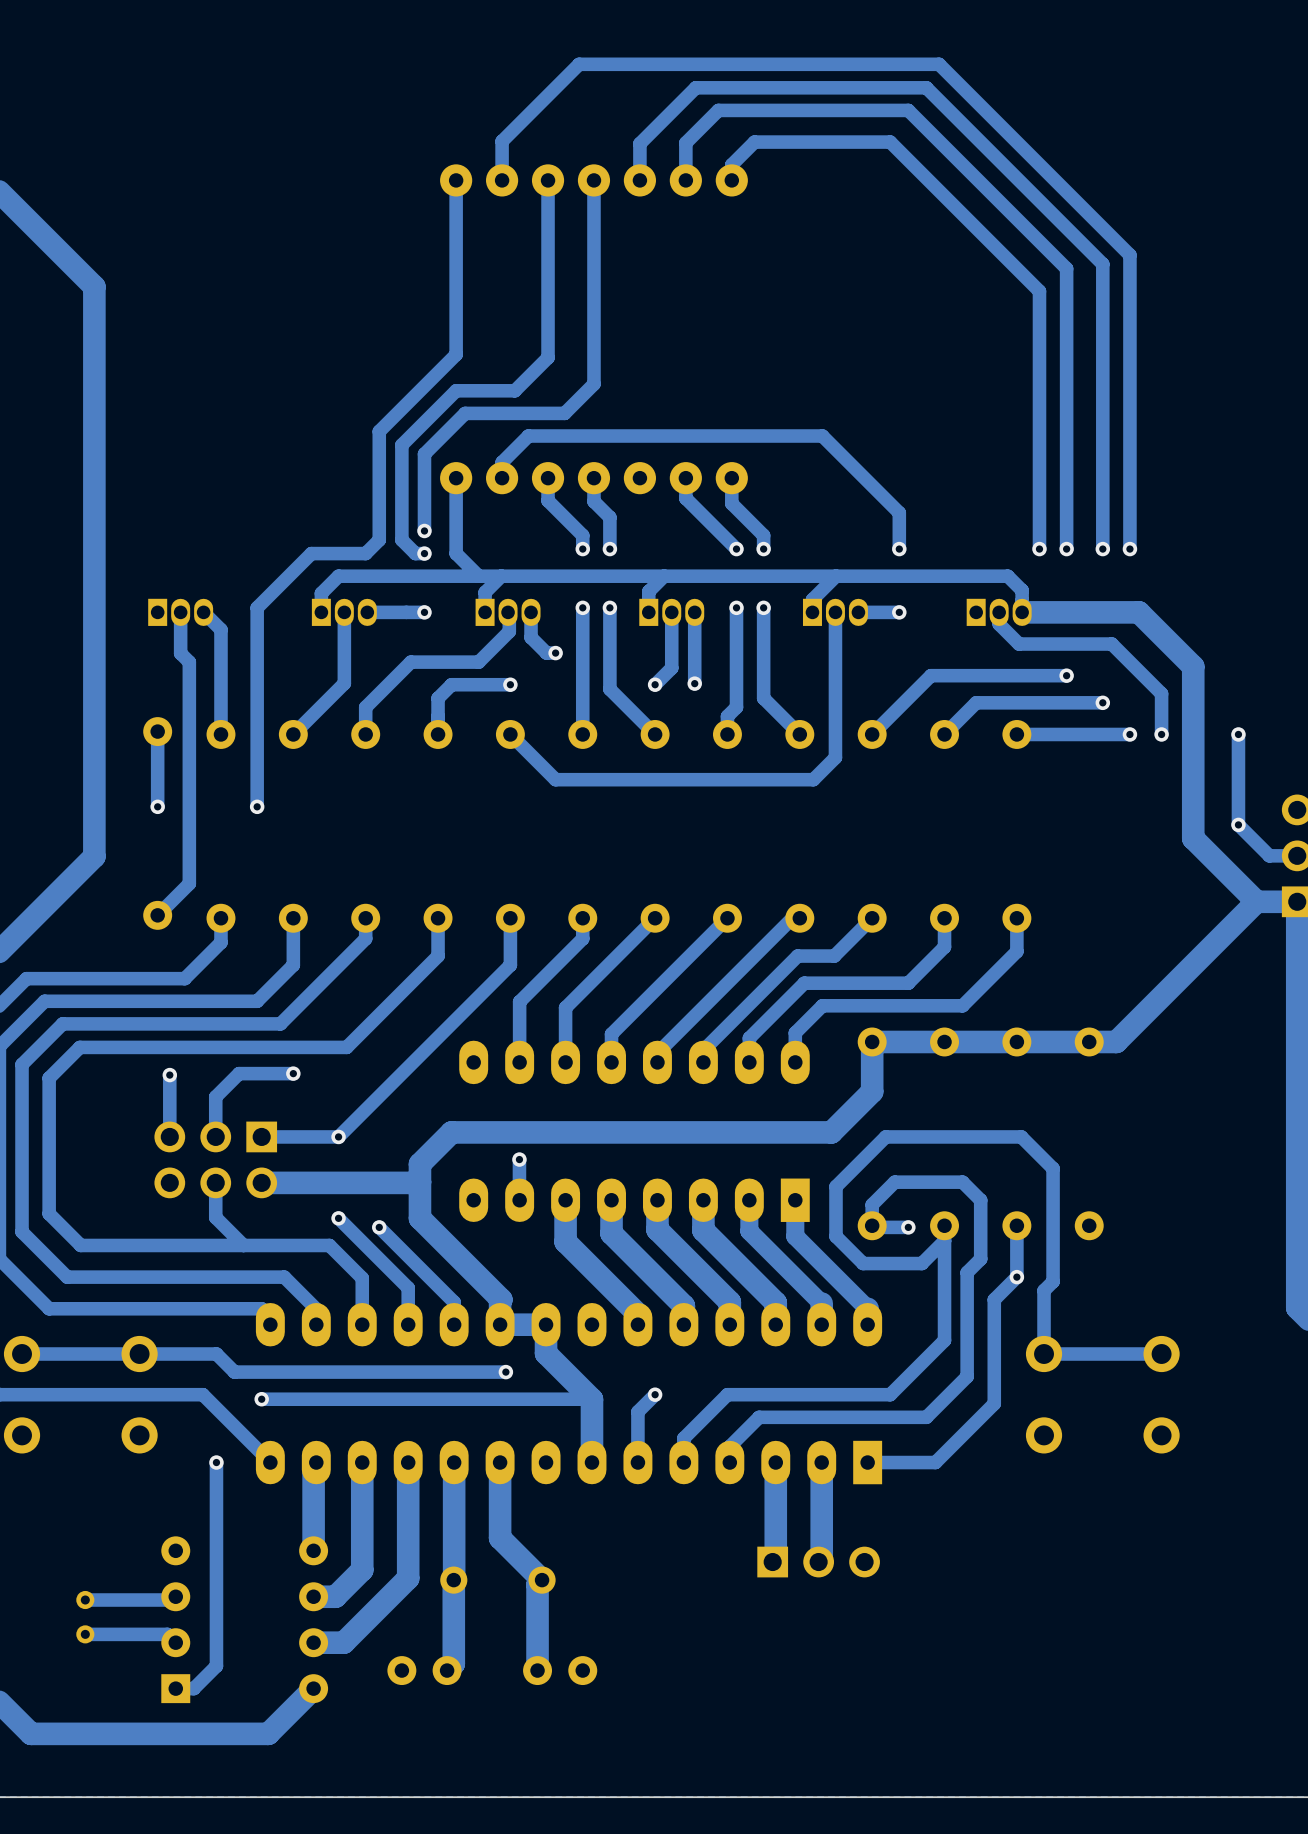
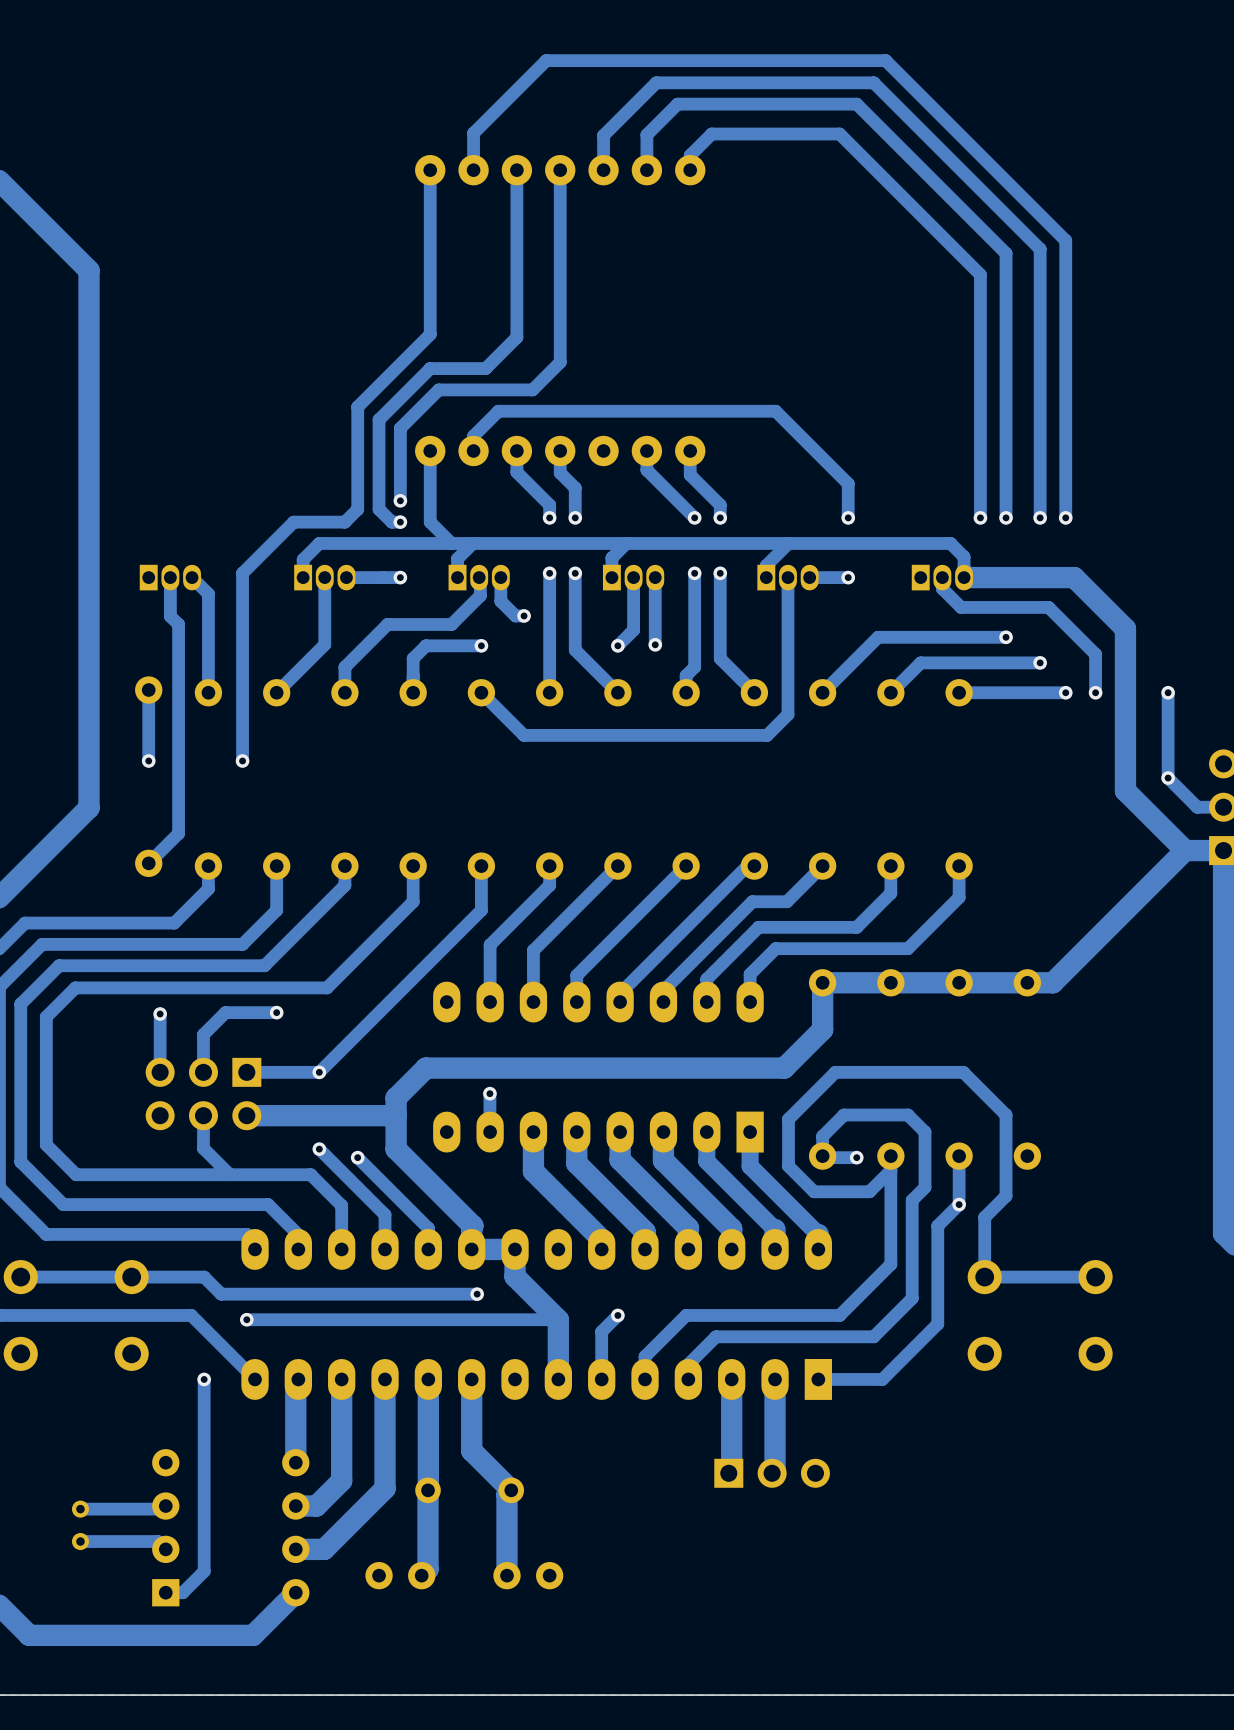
track: (1053, 1168) (1053, 1281) -> (993, 1102) (1006, 1115) (1006, 1196) (993, 1208)

